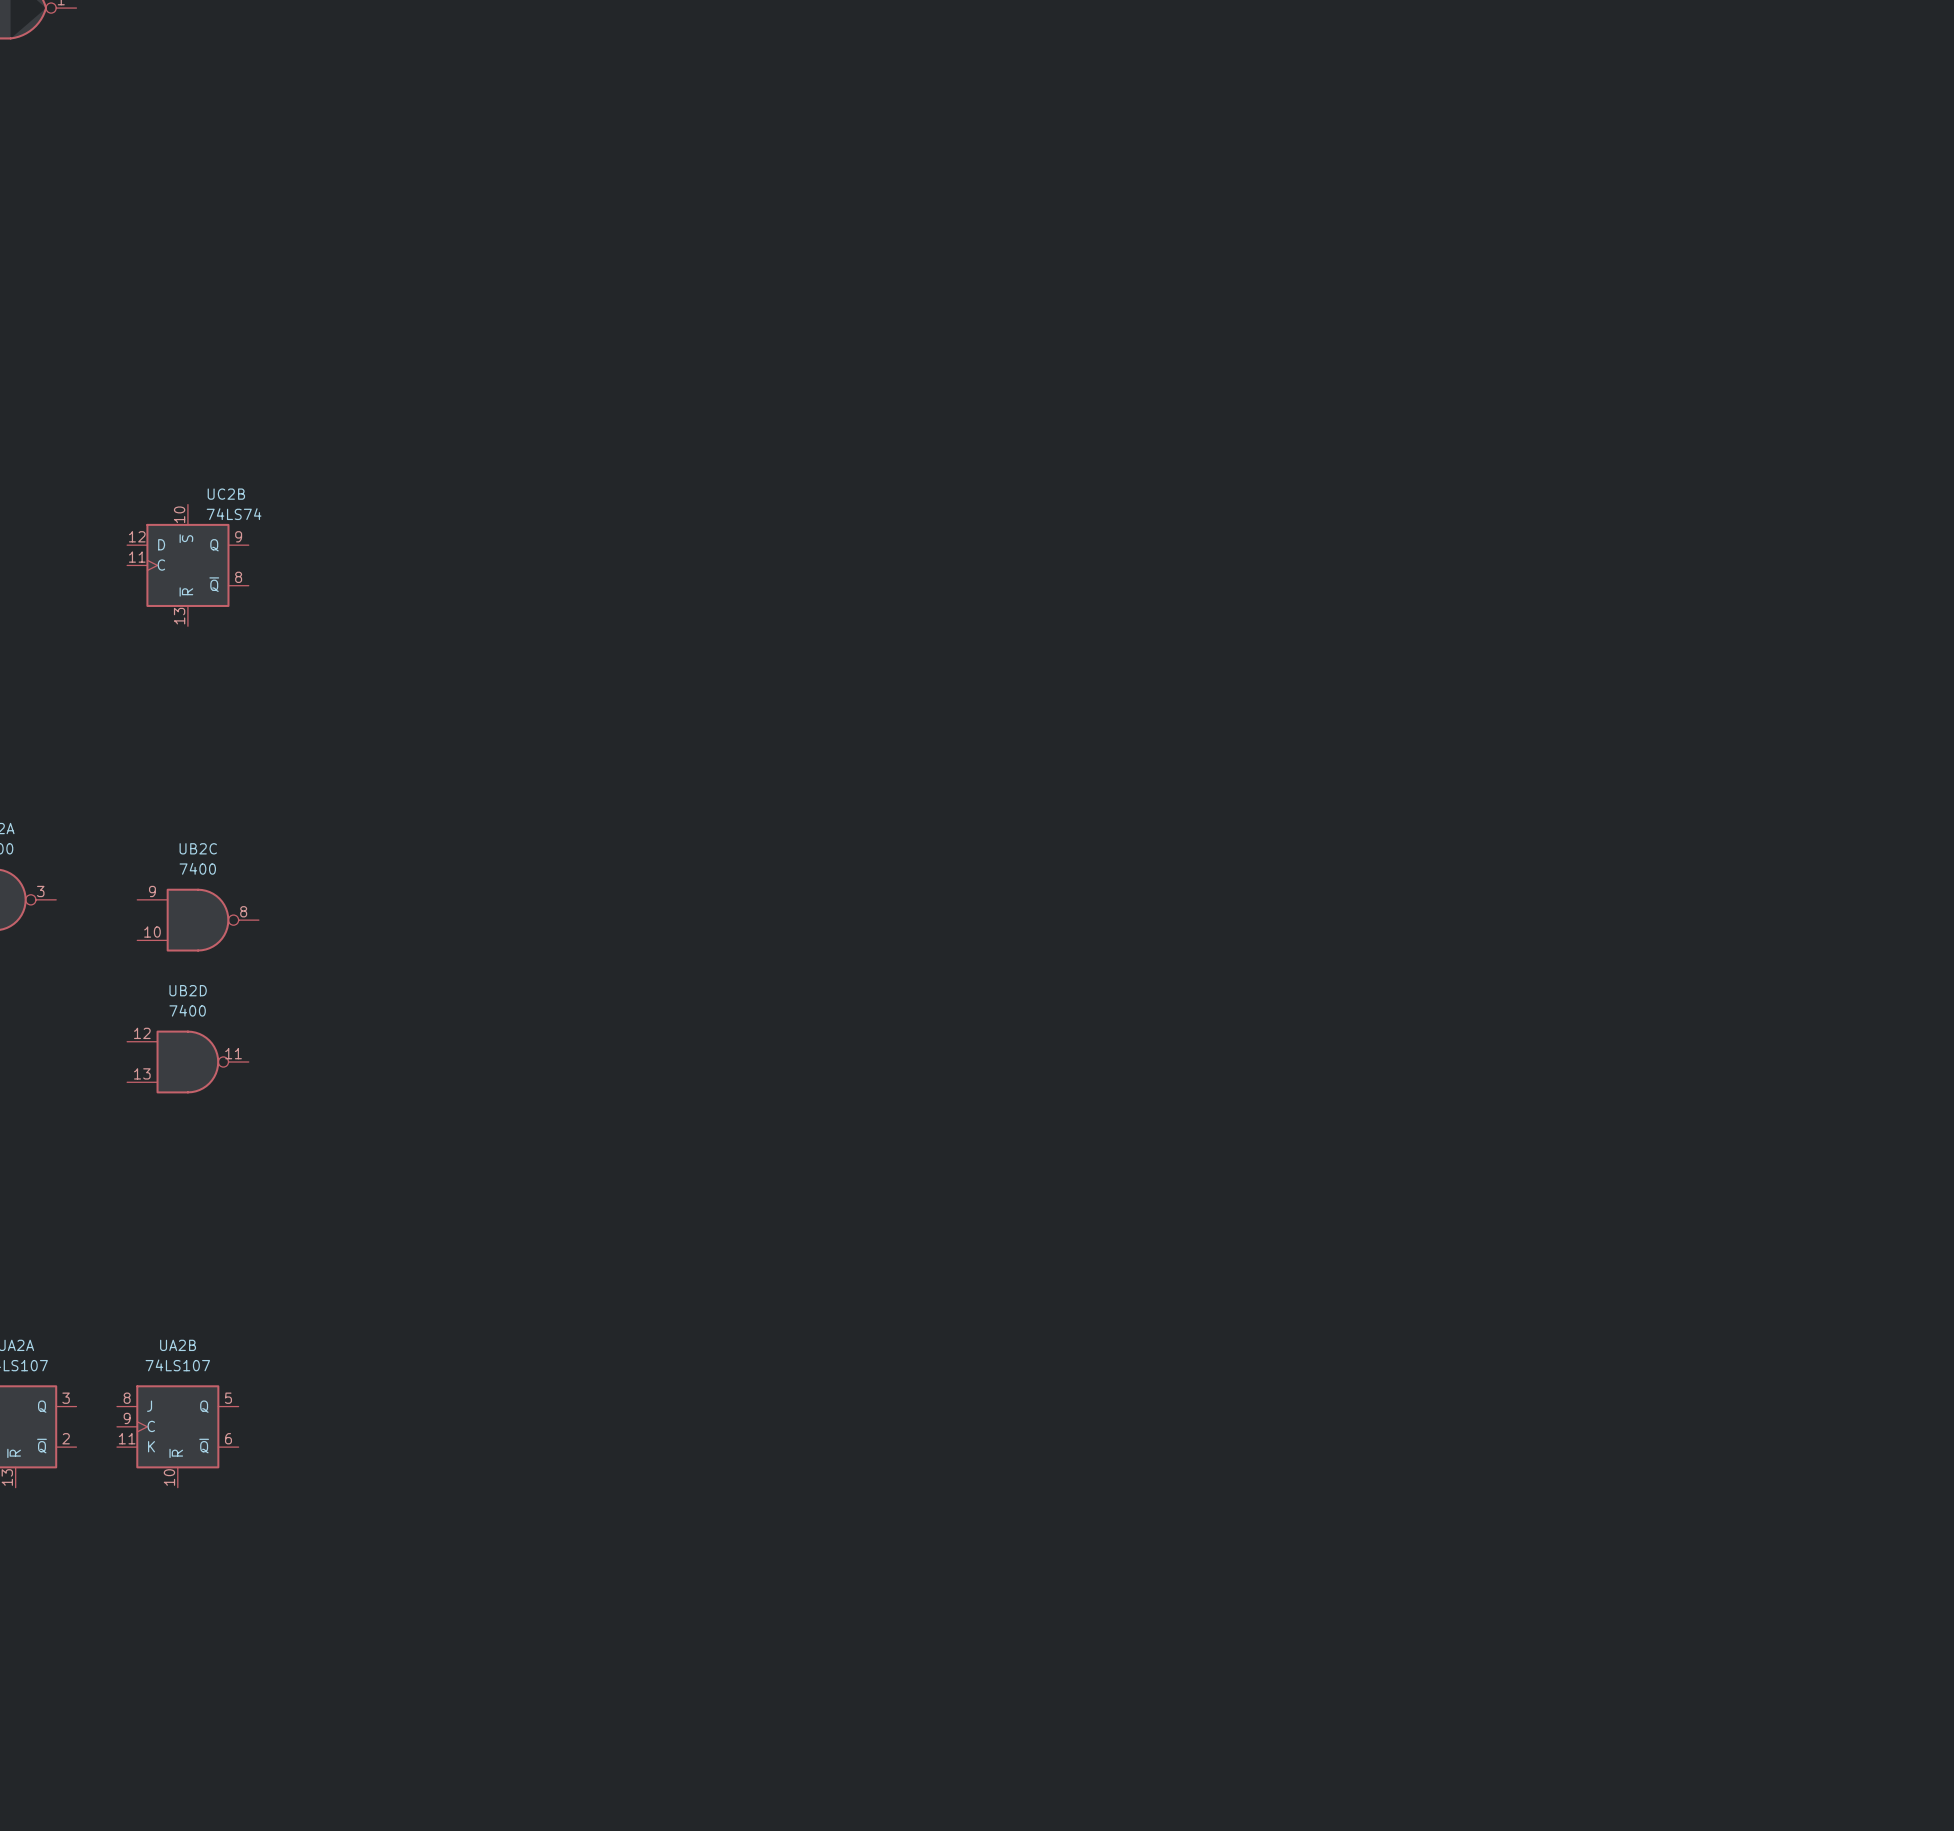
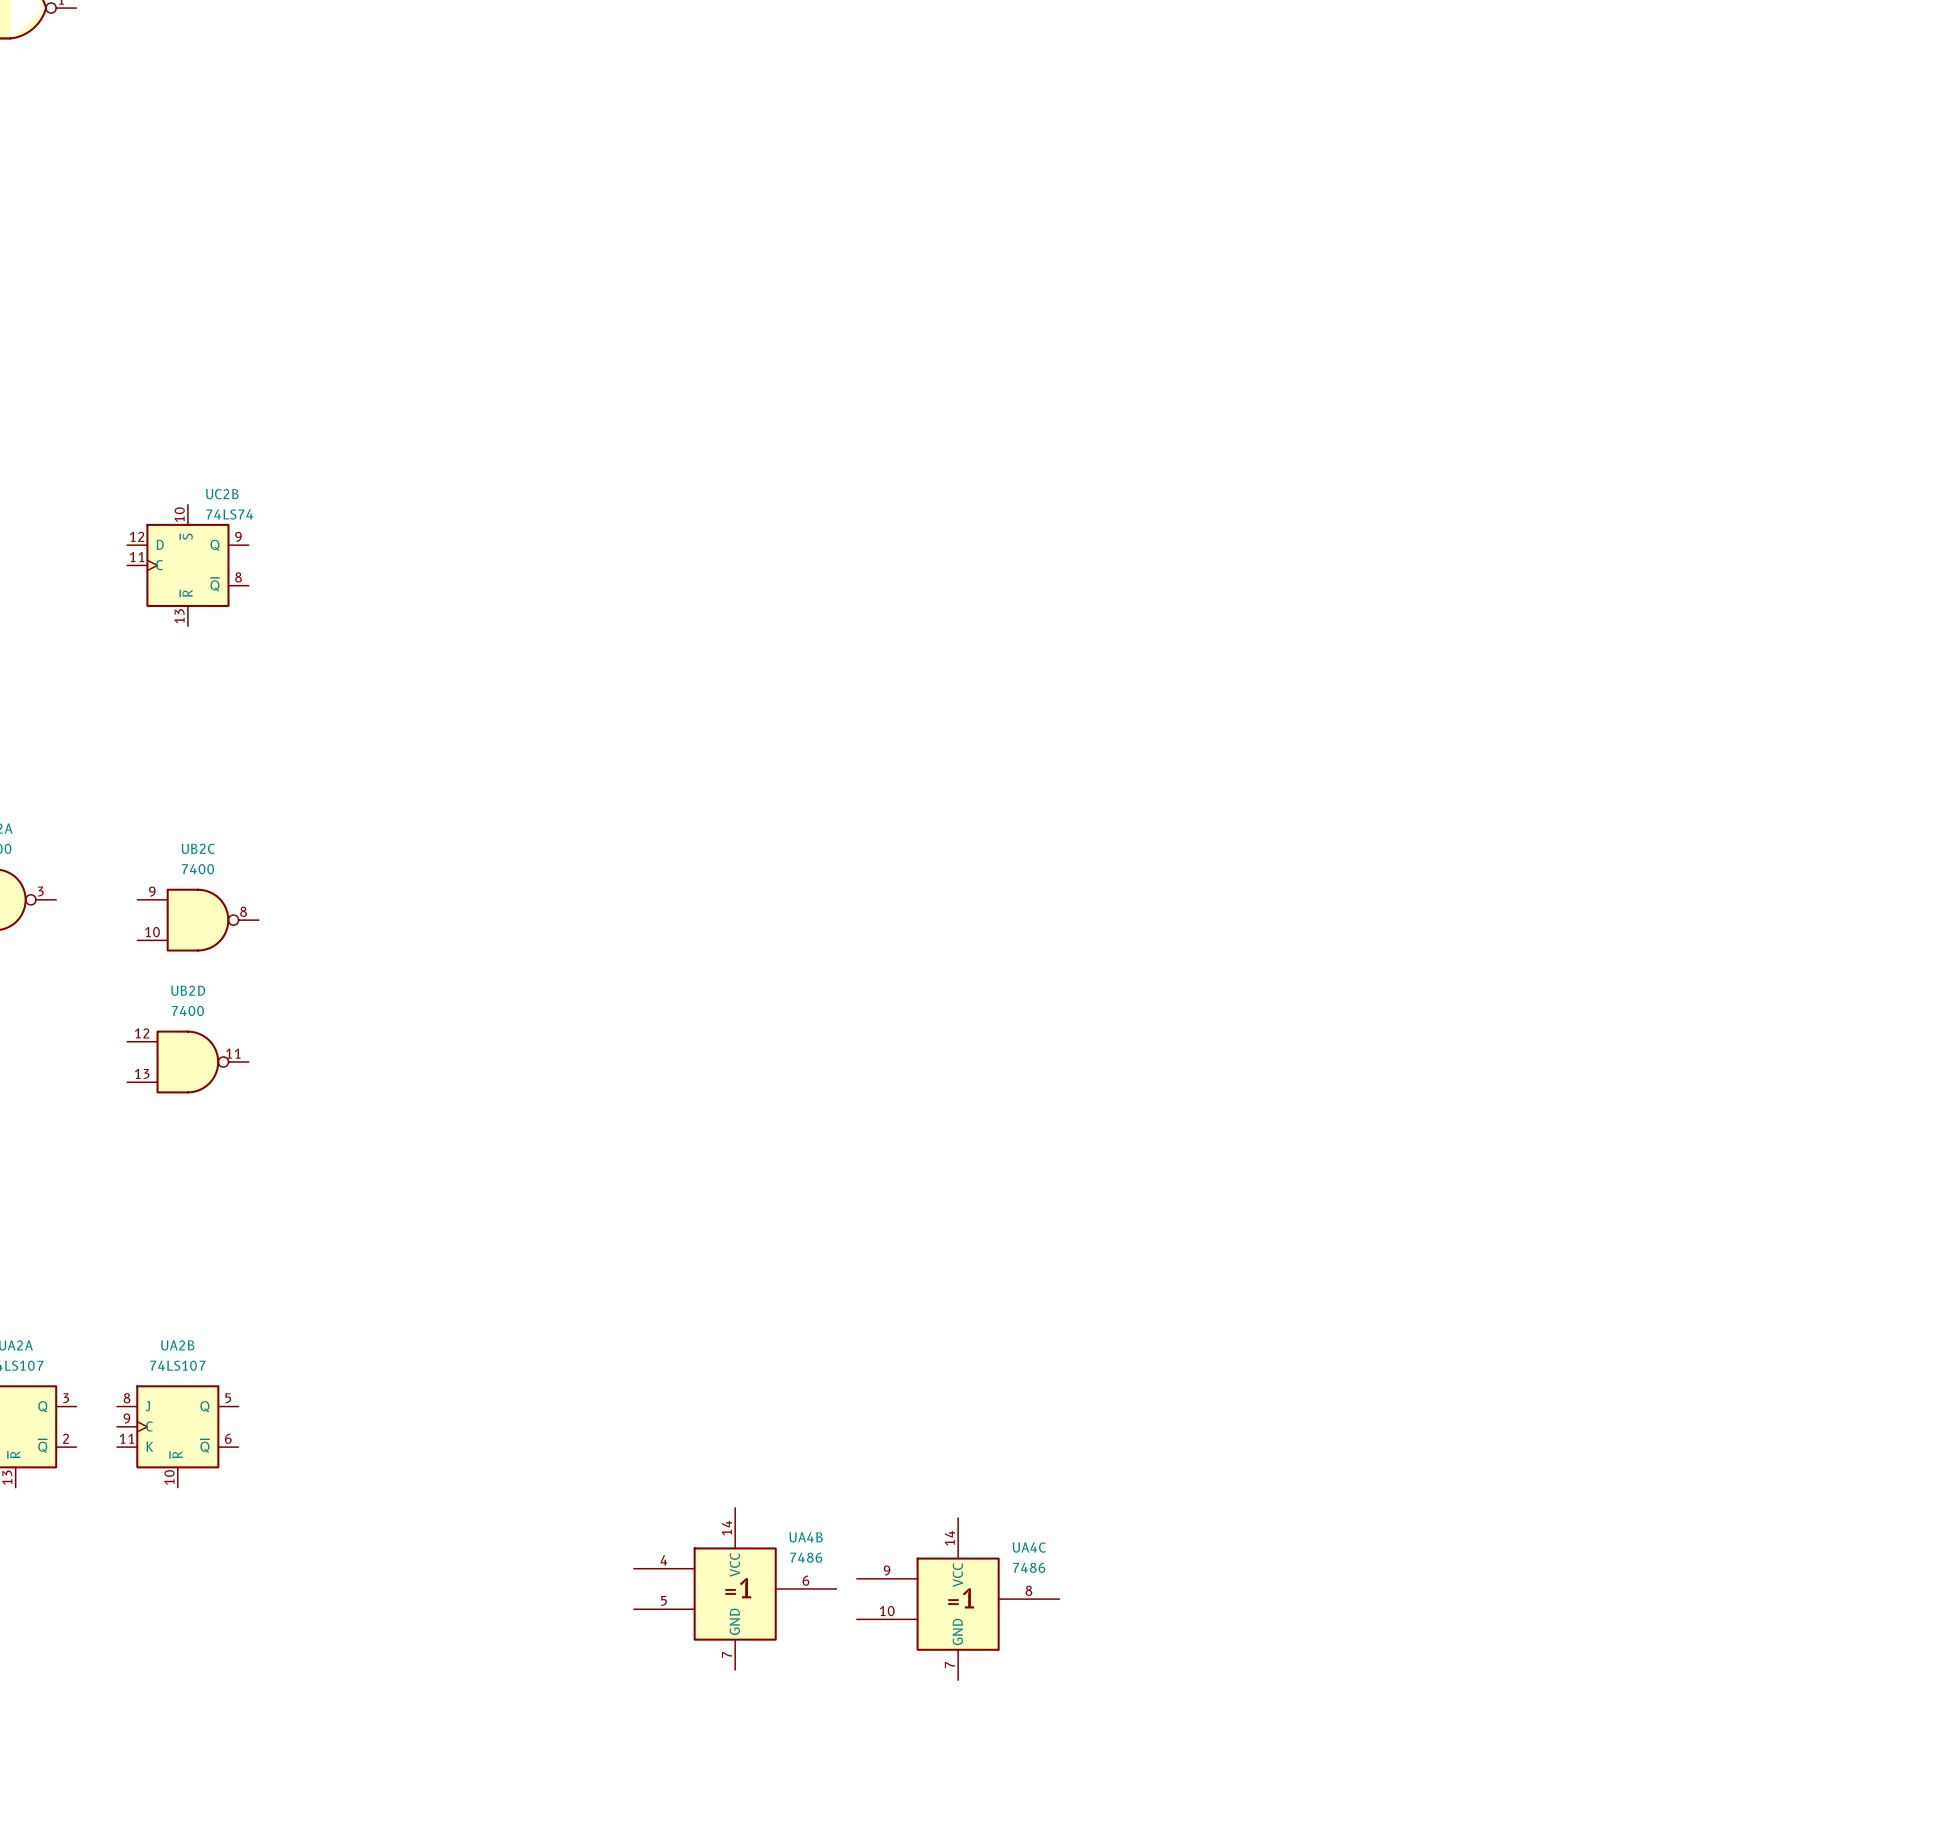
UA4B: none -> 7486 (735, 1588)
UA4C: none -> 7486 (958, 1599)

